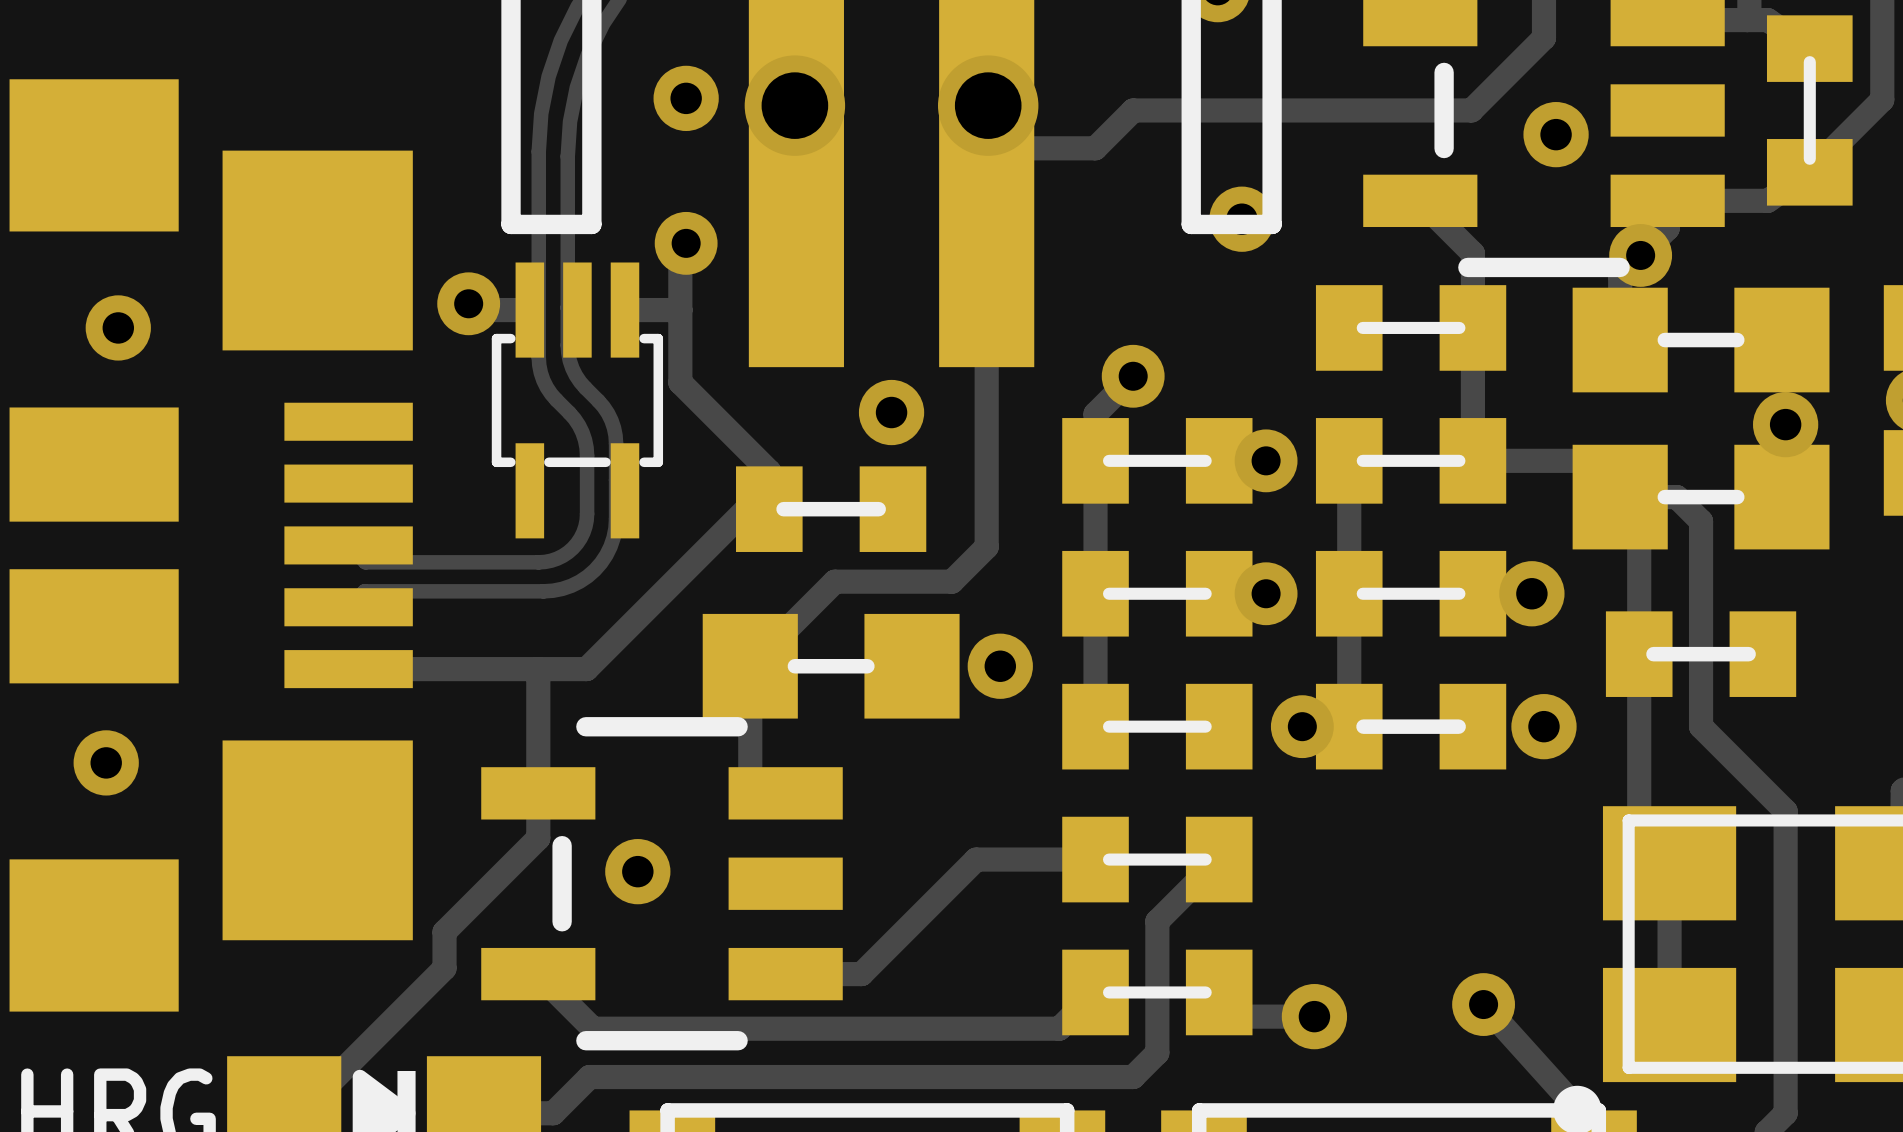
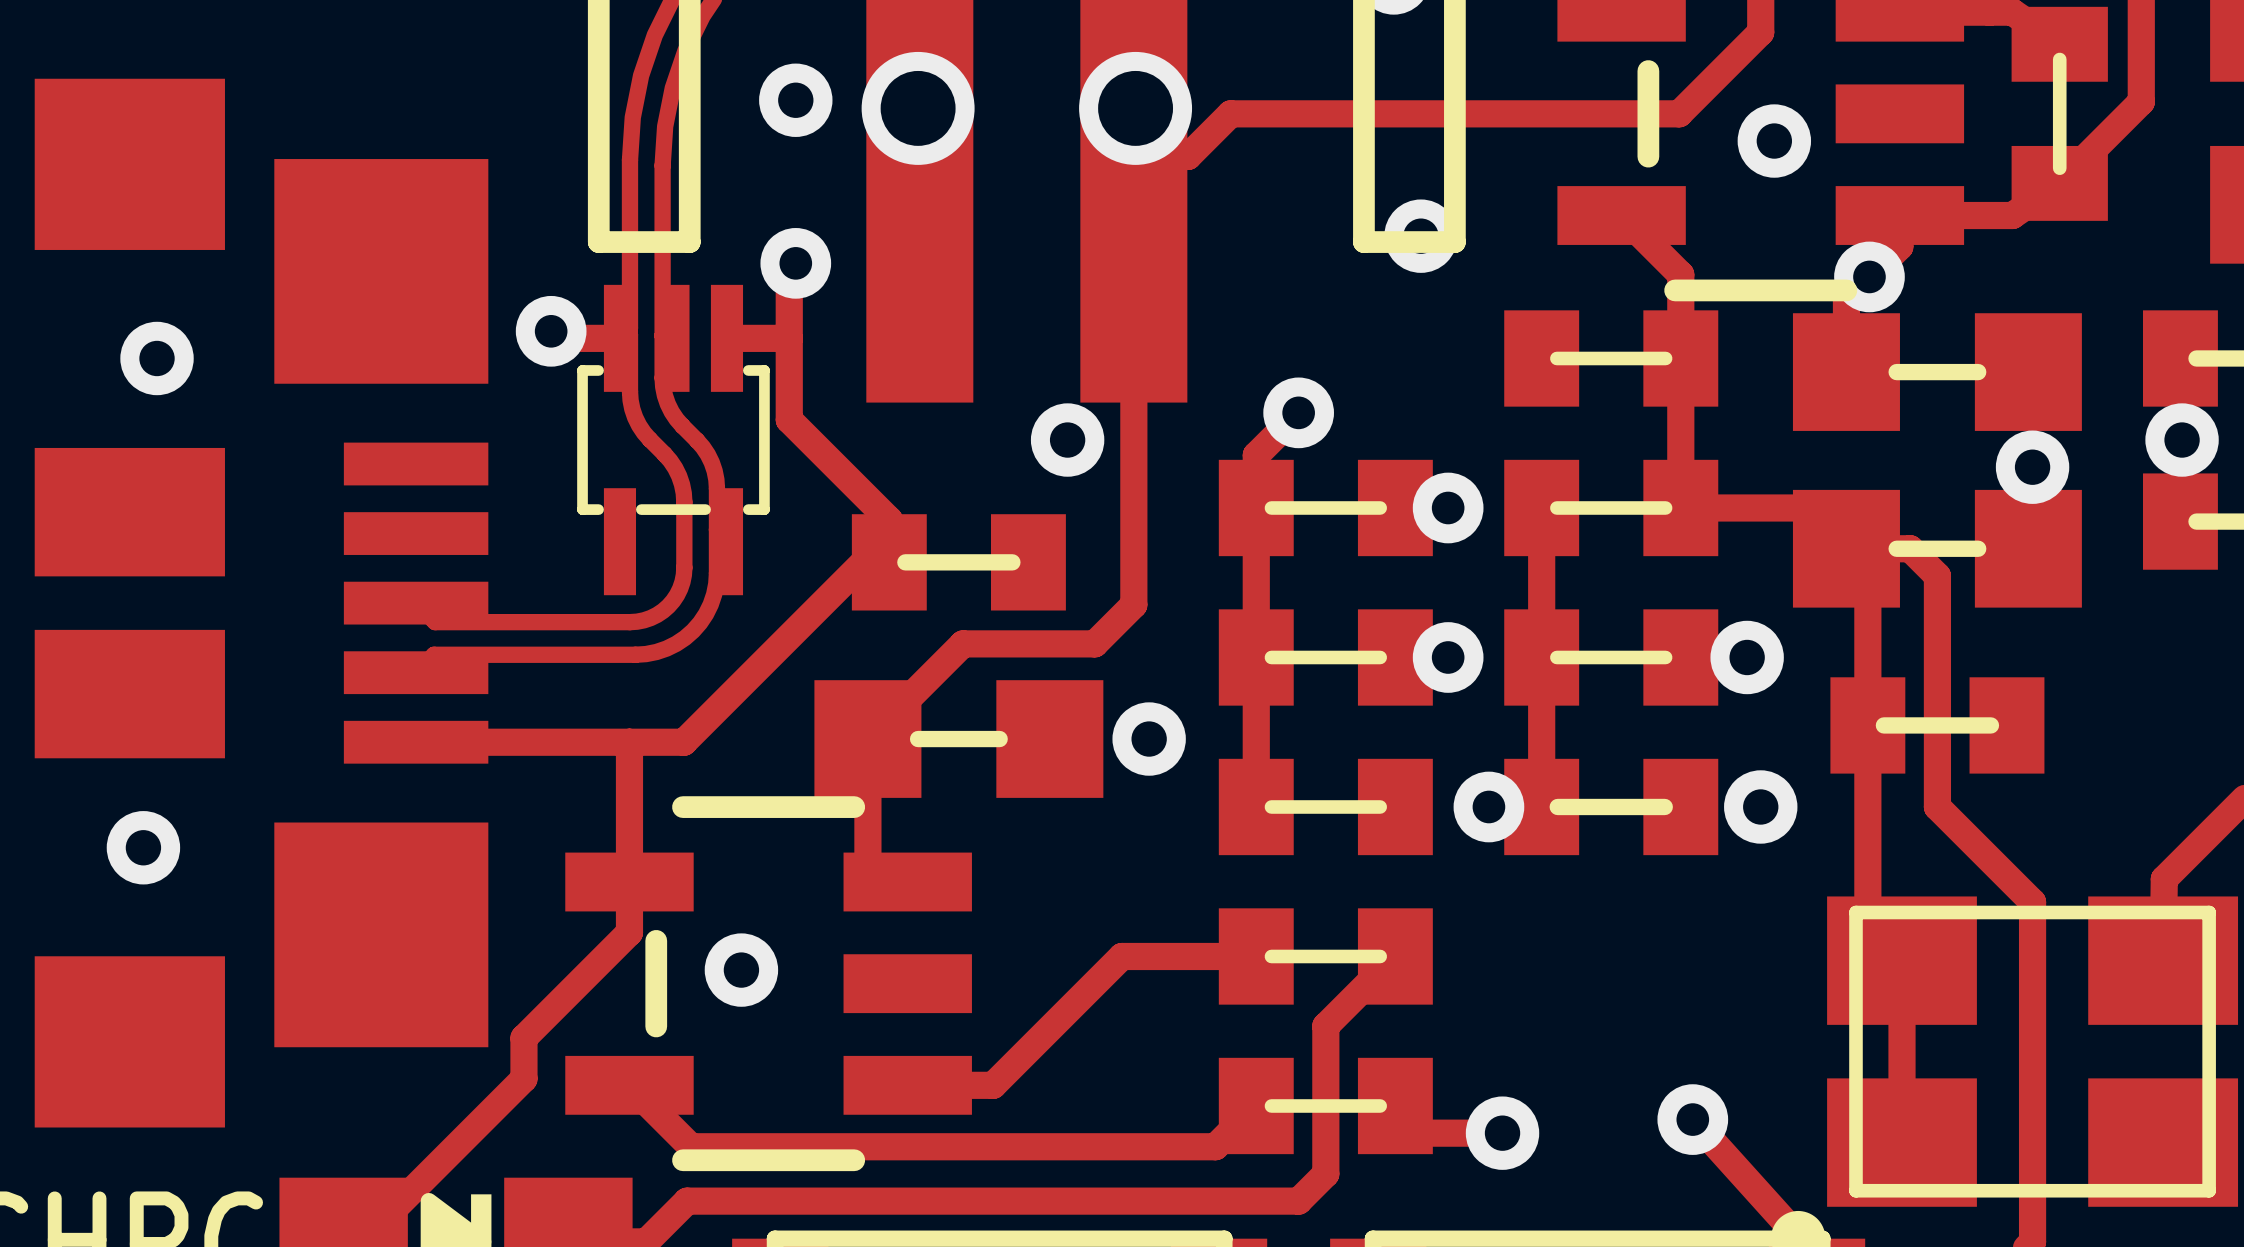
track: (1133, 110) (1095, 148) (1034, 148) -> (1298, 113) (1230, 113) (1188, 156)
via position: (891, 412) -> (1067, 440)

